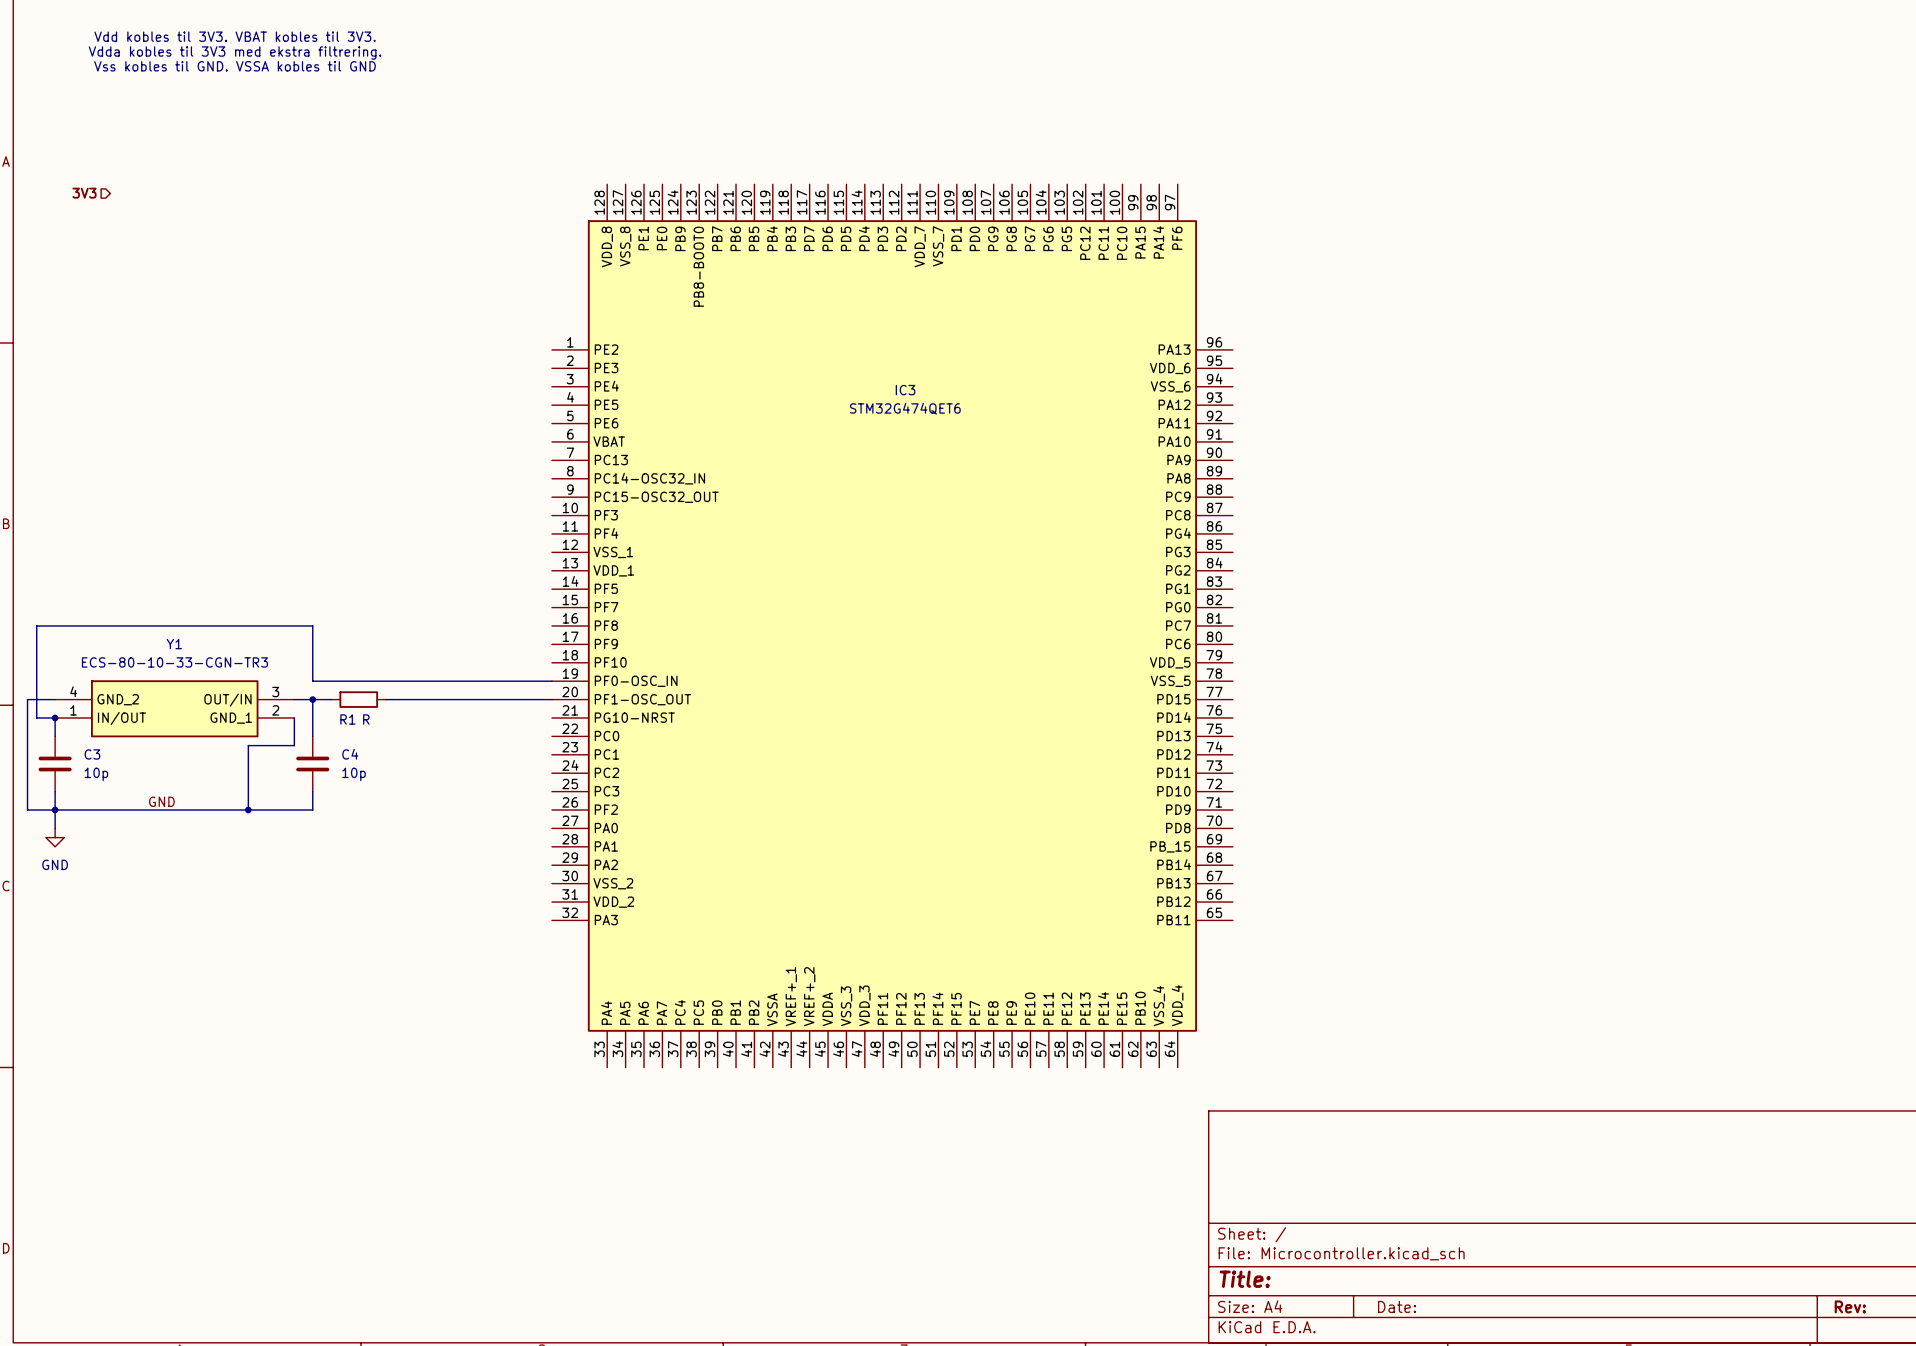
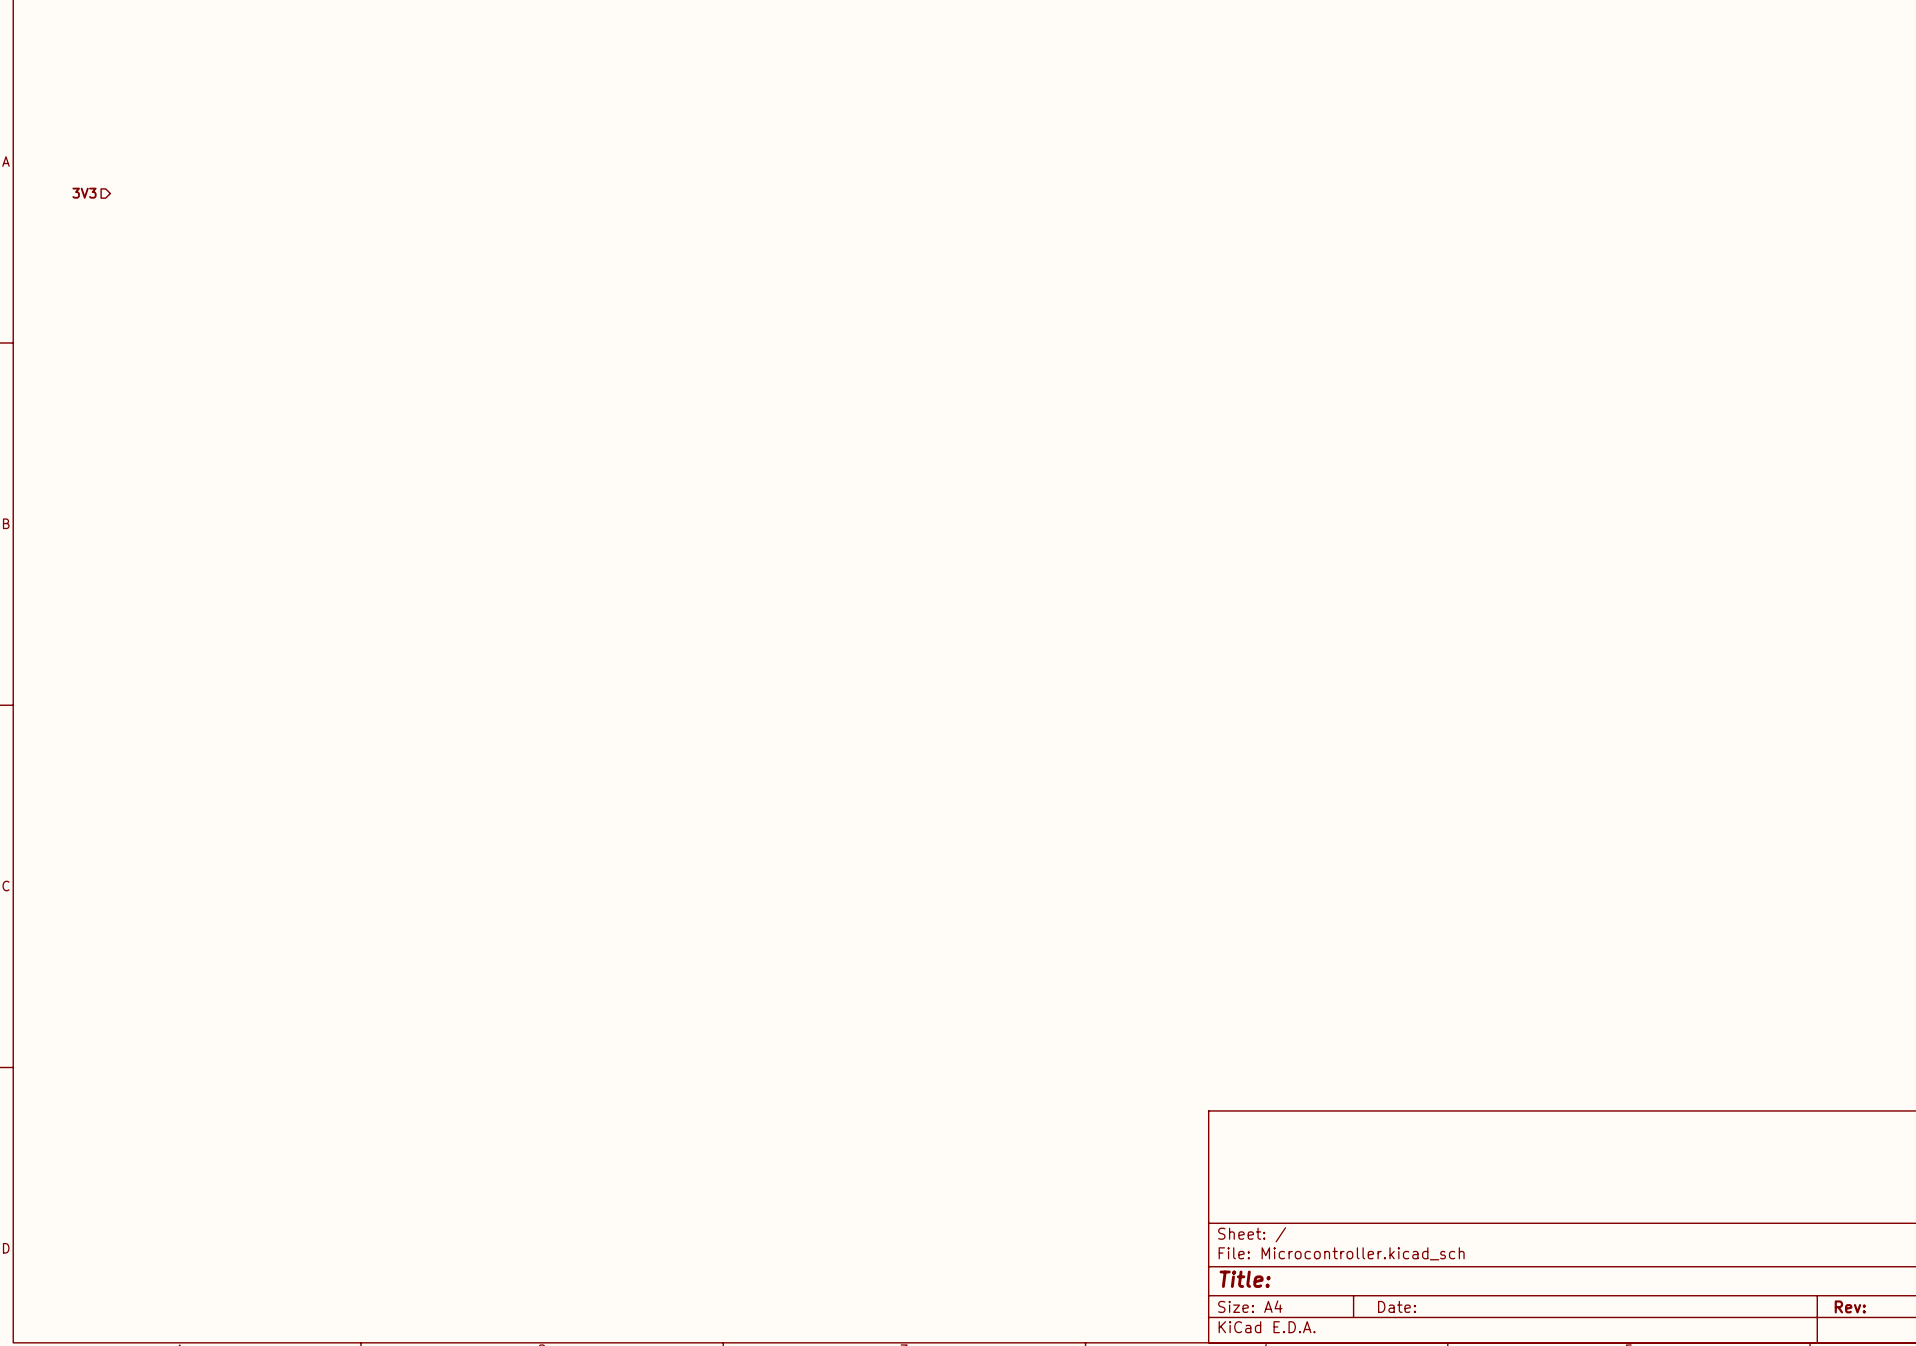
text: Vdd kobles til 3V3. VBAT kobles til 3V3. (235, 36) -> none
text: Vdda kobles til 3V3 med ekstra filtrering. (235, 53) -> none
text: Vss kobles til GND. VSSA kobles til GND (235, 66) -> none
IC3: STM32G474QET6 (892, 625) -> none
wire: (551, 681) (312, 681) (312, 625) (36, 625) (36, 718) (55, 718) (55, 736) -> none
wire: (55, 699) (27, 699) (27, 810) (312, 810) (312, 791) -> none
wire: (294, 699) (331, 699) -> none
wire: (312, 699) (312, 736) -> none
junction: (312, 699) -> none
R1: R (358, 699) -> none
wire: (386, 699) (551, 699) -> none
Y1: ECS-80-10-33-CGN-TR3 (174, 708) -> none
junction: (55, 718) -> none
wire: (294, 718) (294, 745) (248, 745) (248, 810) -> none
C3: 10p (55, 764) -> none
C4: 10p (312, 764) -> none
wire: (55, 791) (55, 828) -> none
label: GND (161, 801) -> none
junction: (55, 810) -> none
junction: (248, 810) -> none
power symbol: GND (55, 837) -> none

